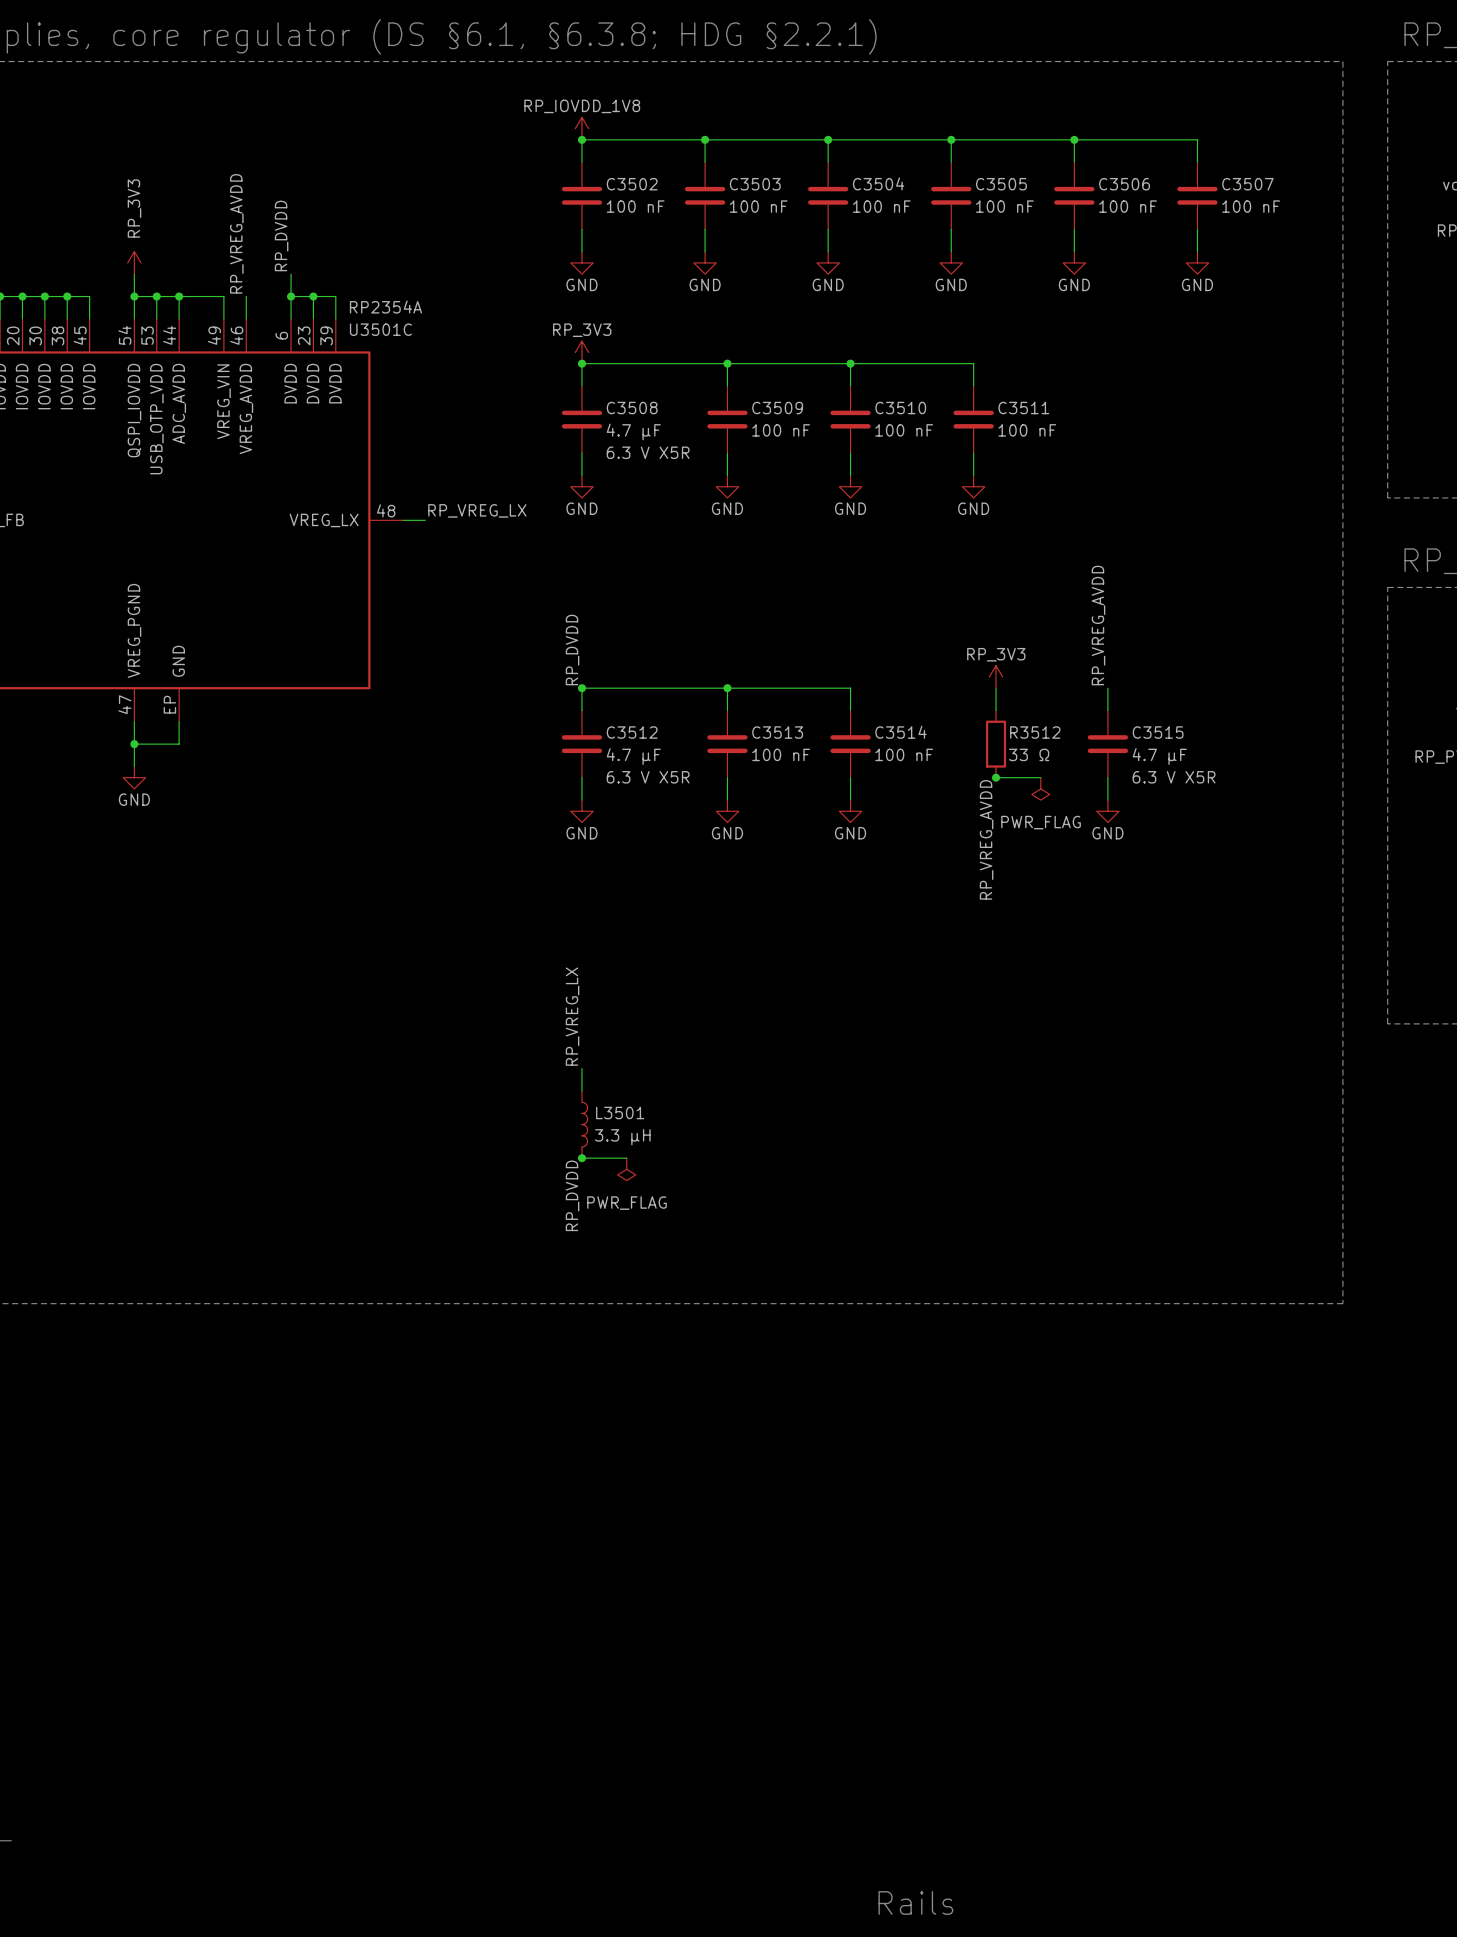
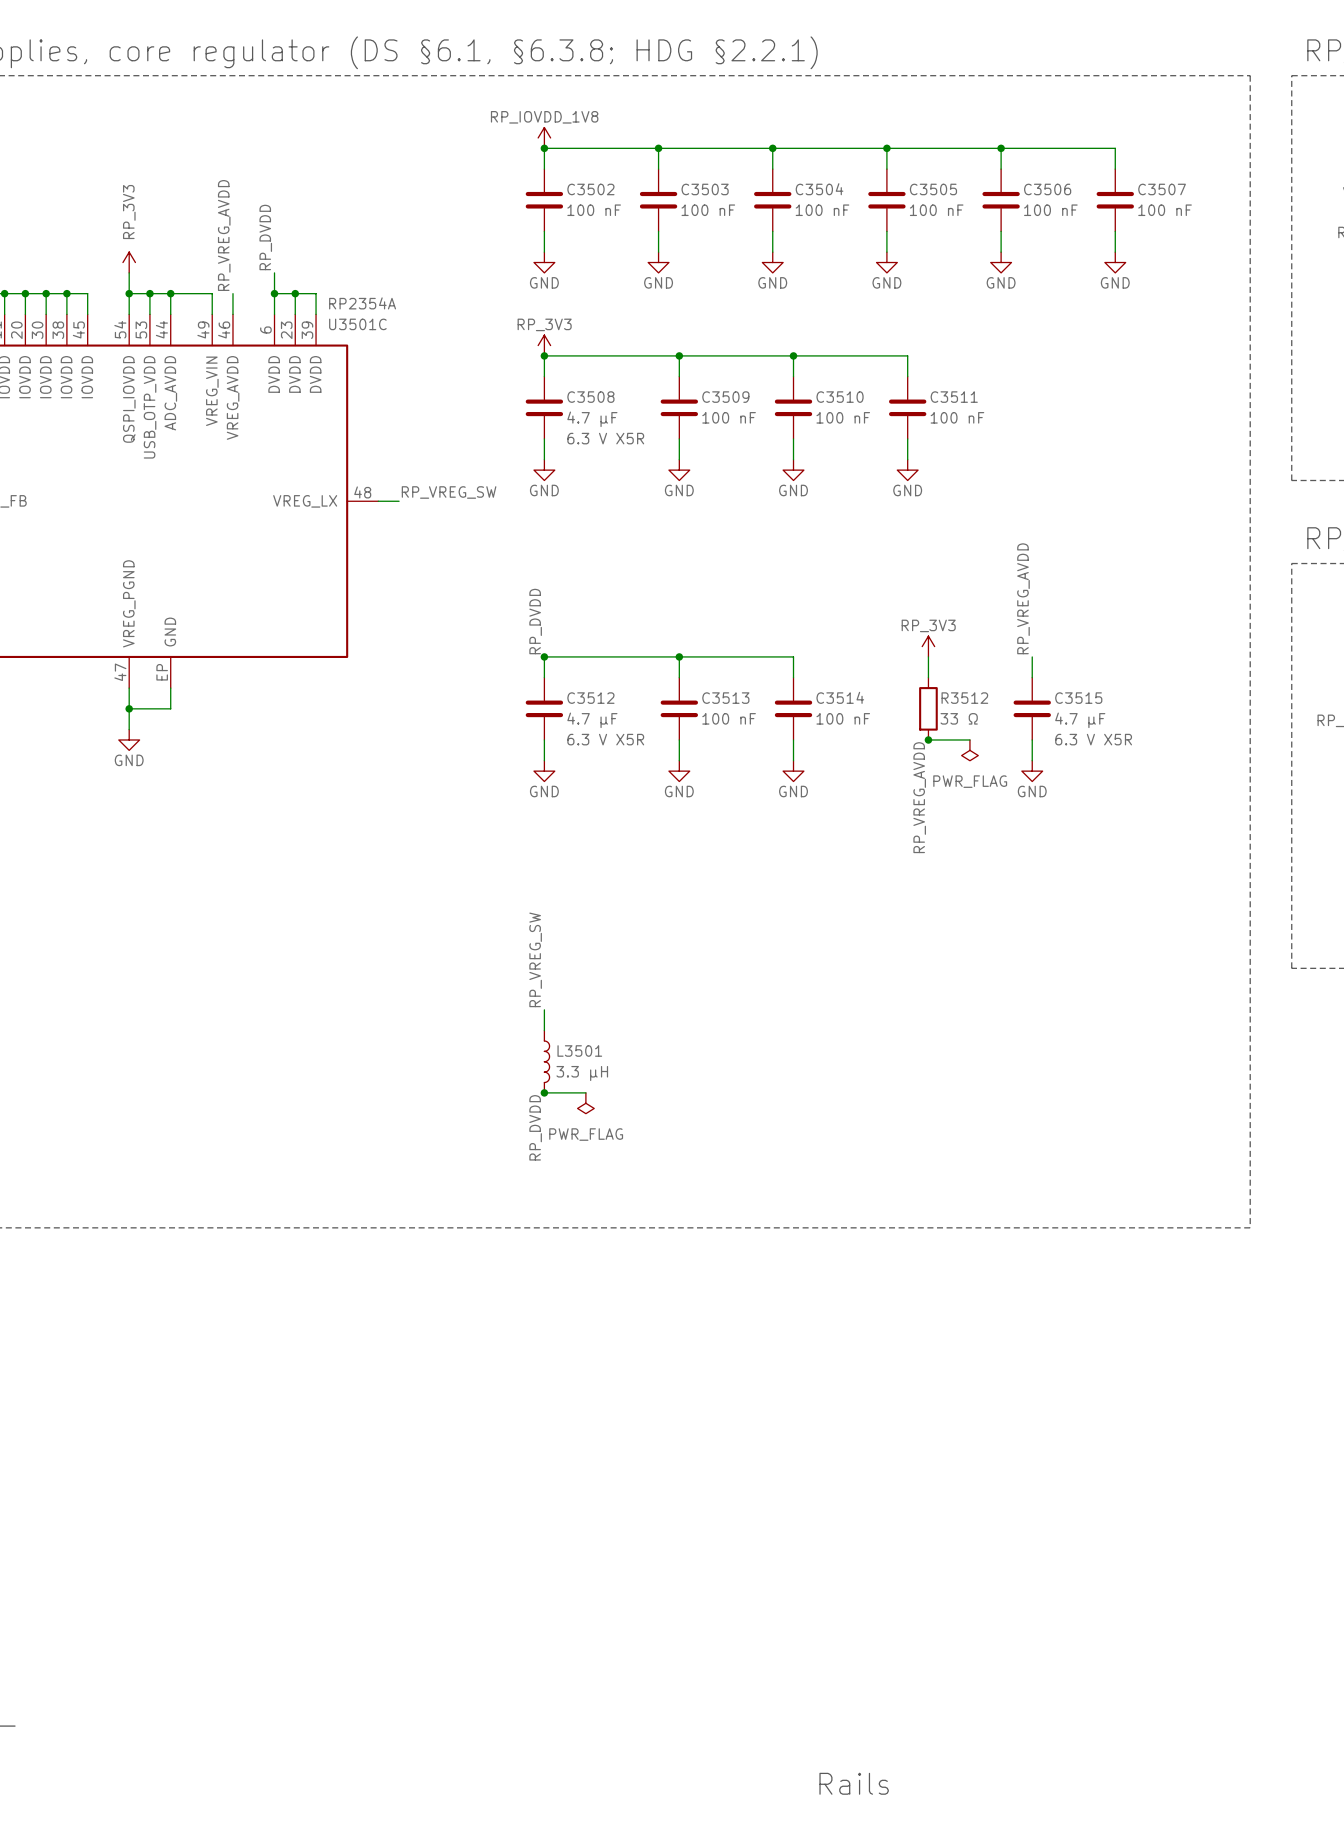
label: RP_VREG_LX (477, 510) -> RP_VREG_SW (449, 492)
label: RP_VREG_LX (572, 1016) -> RP_VREG_SW (535, 959)

